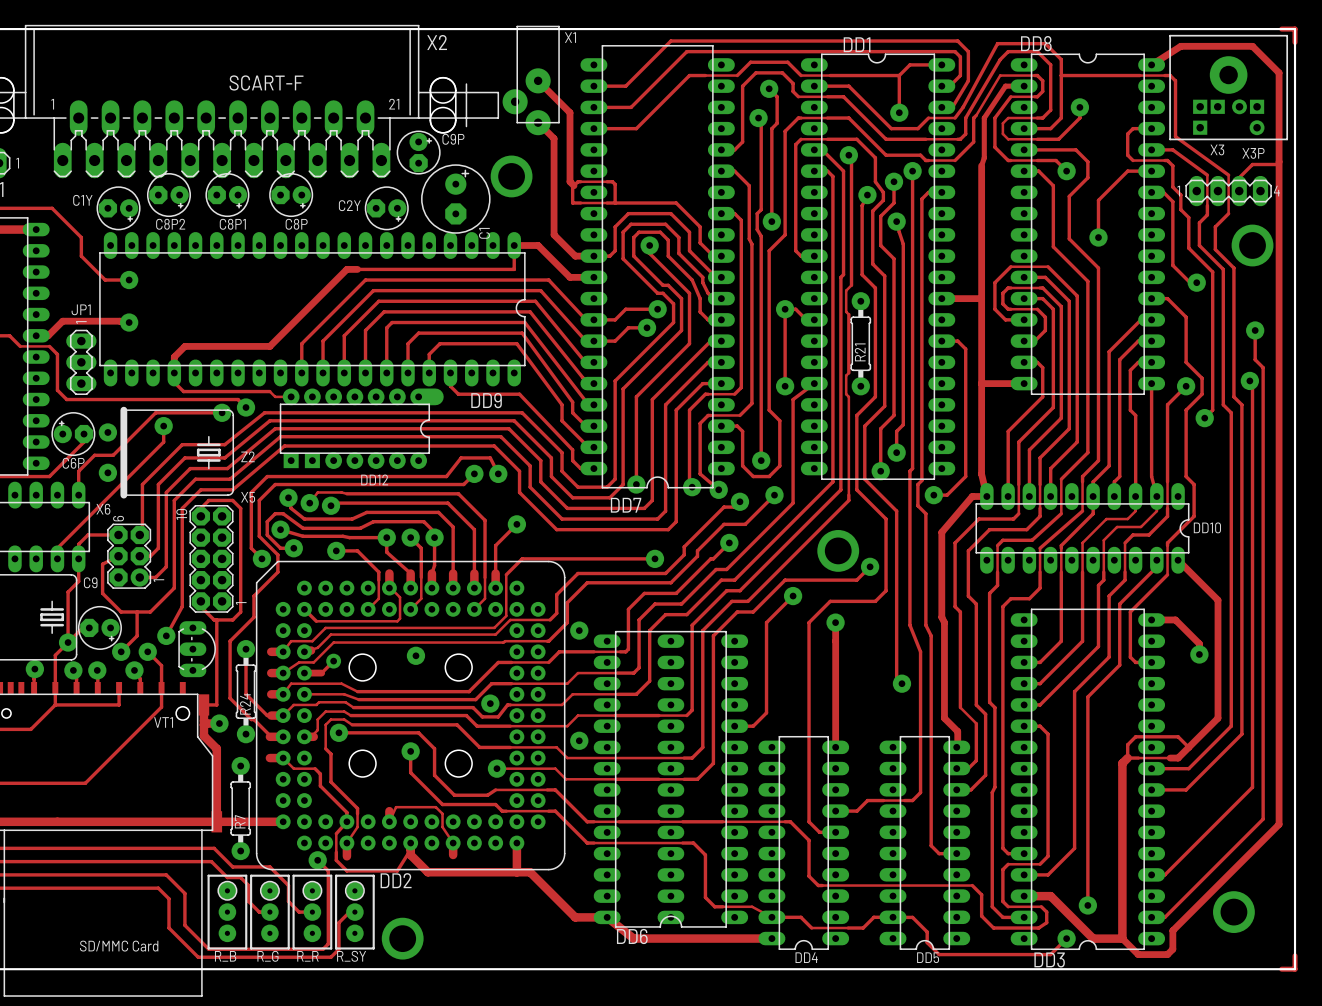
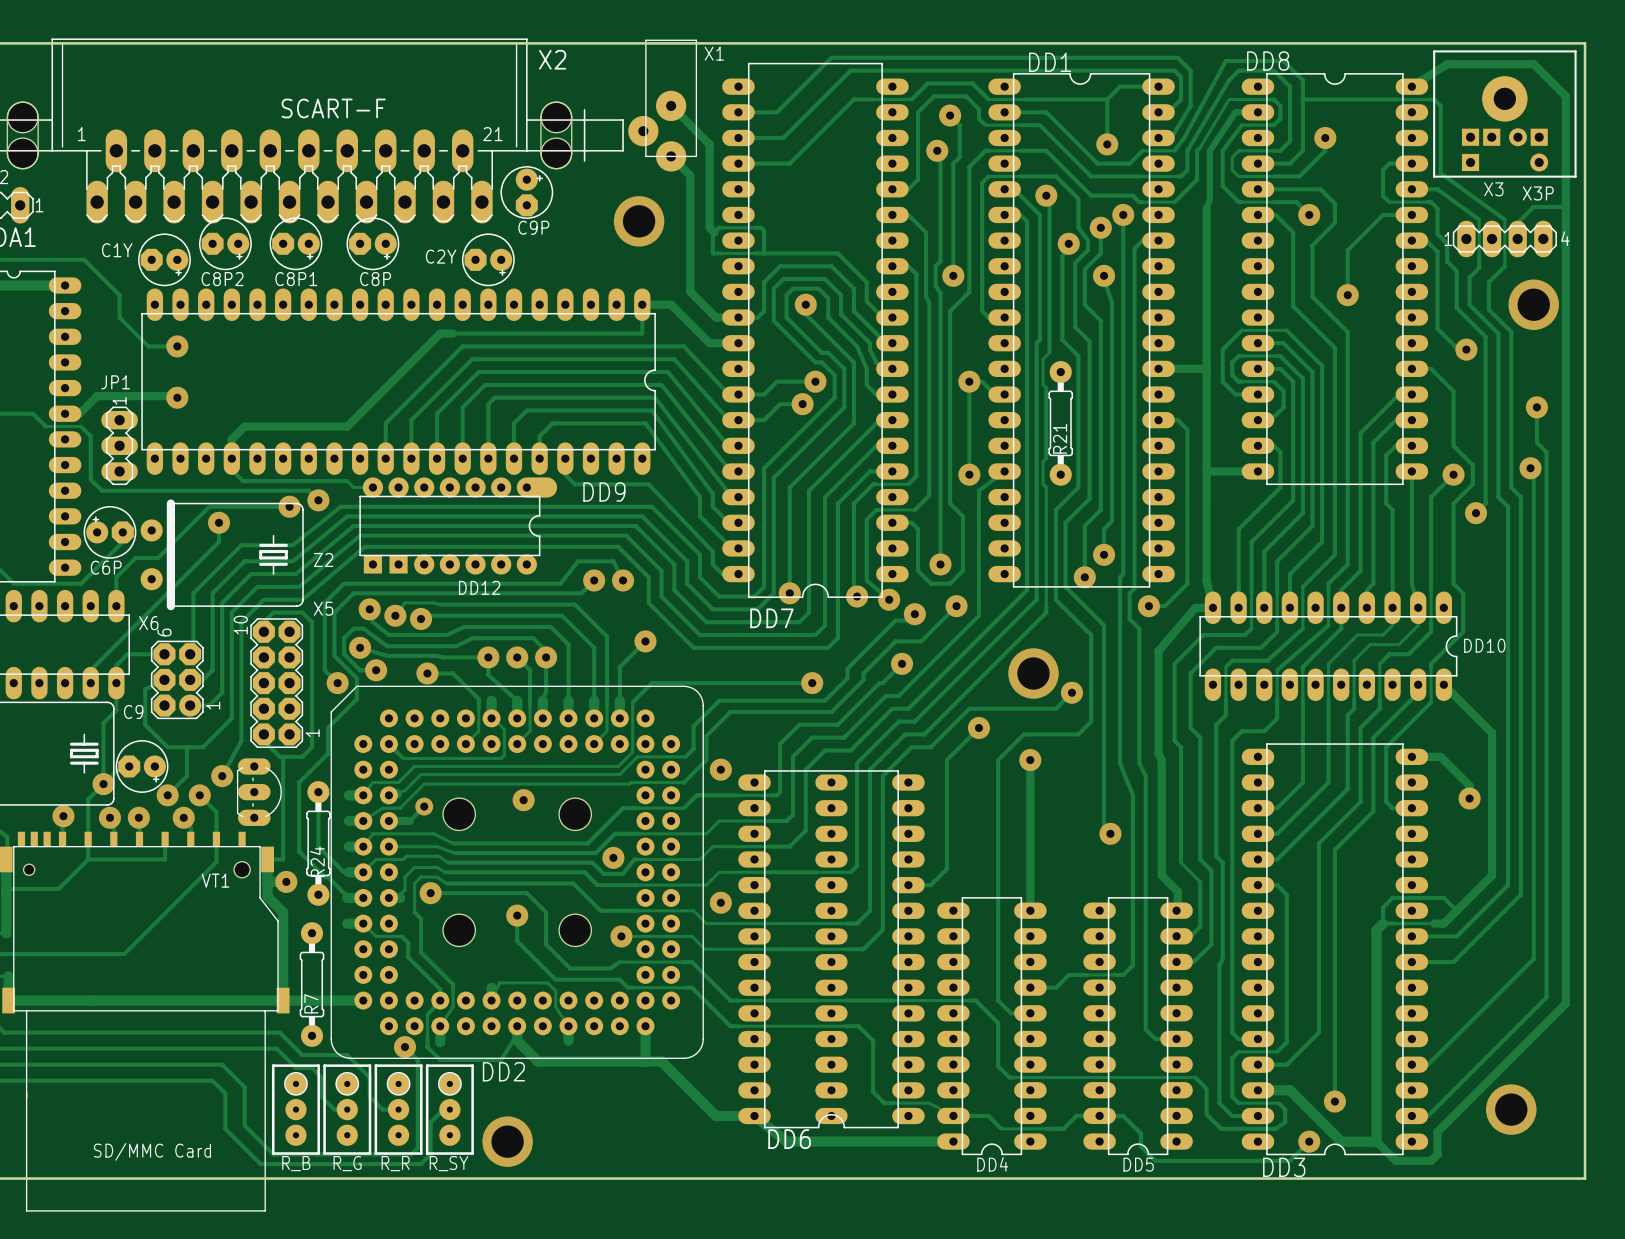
track: (1281, 29) (1295, 29) (1295, 42) -> none
C9P name position: C9P (453, 139) -> C9P (533, 227)
C1: (455, 199) -> none
track: (1295, 955) (1295, 969) (1281, 969) -> none

